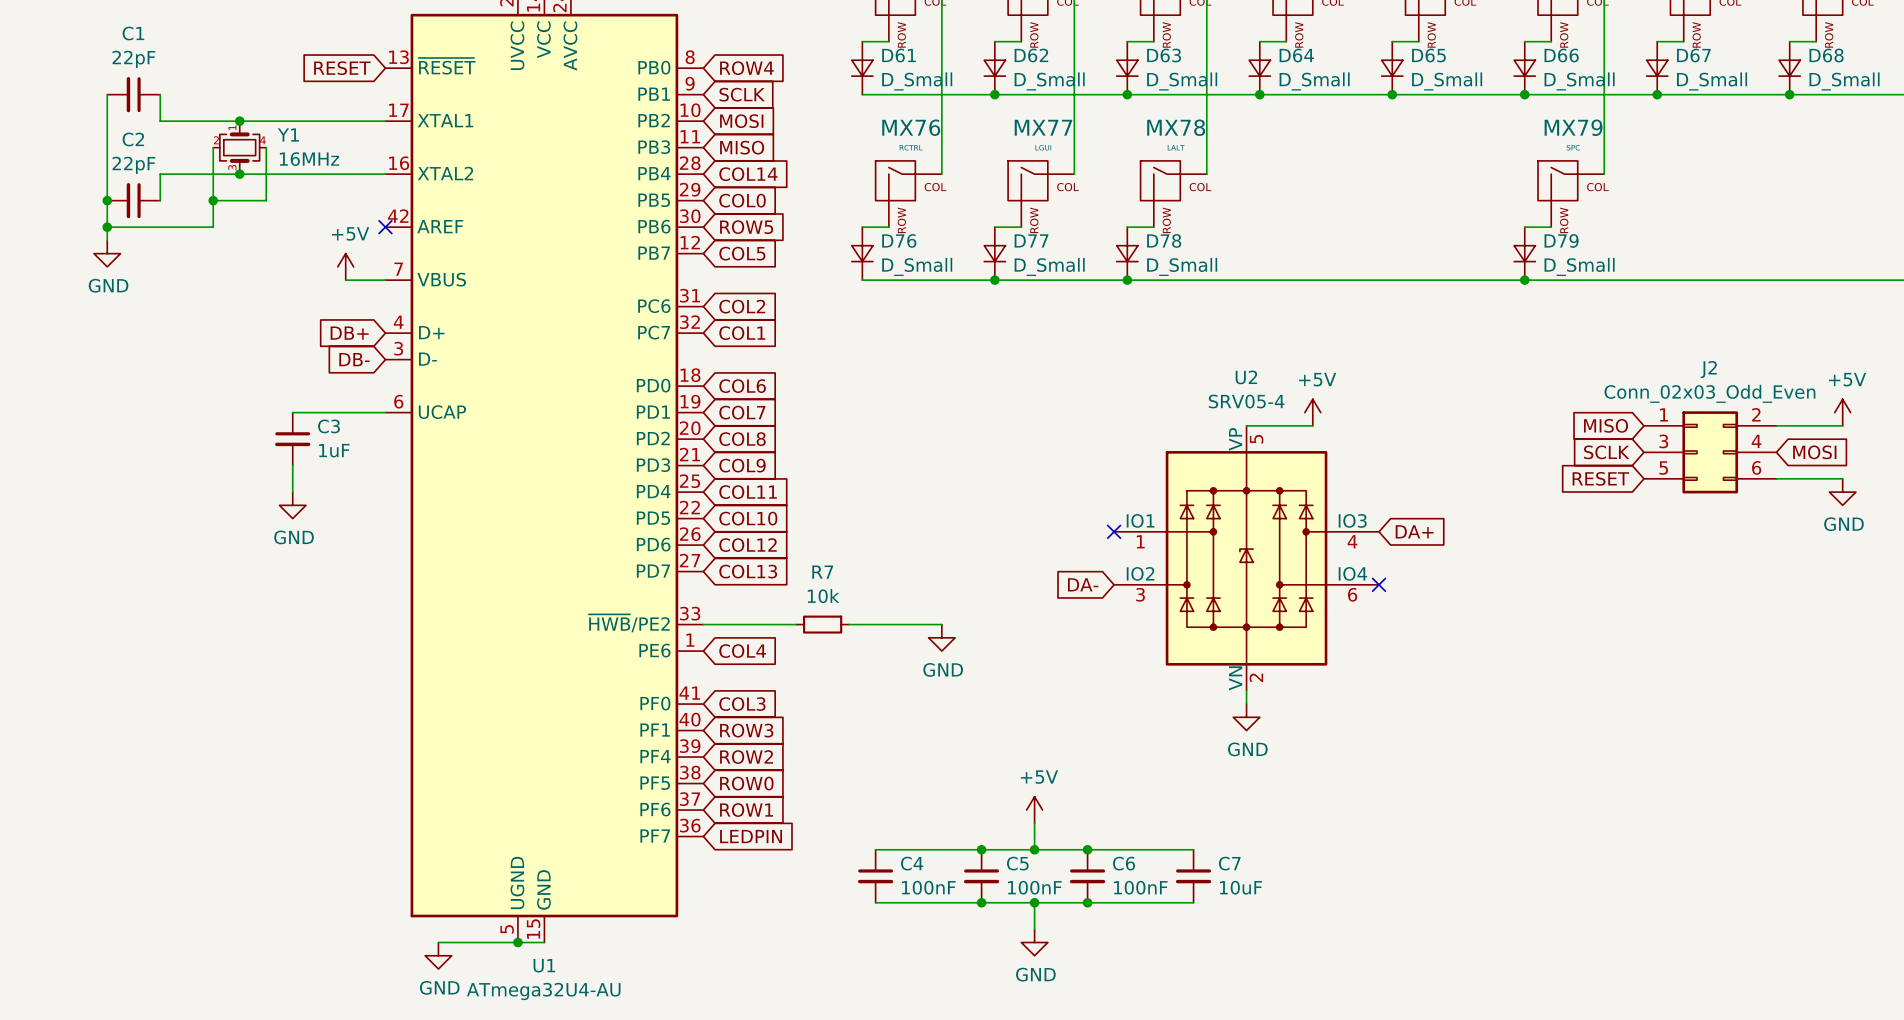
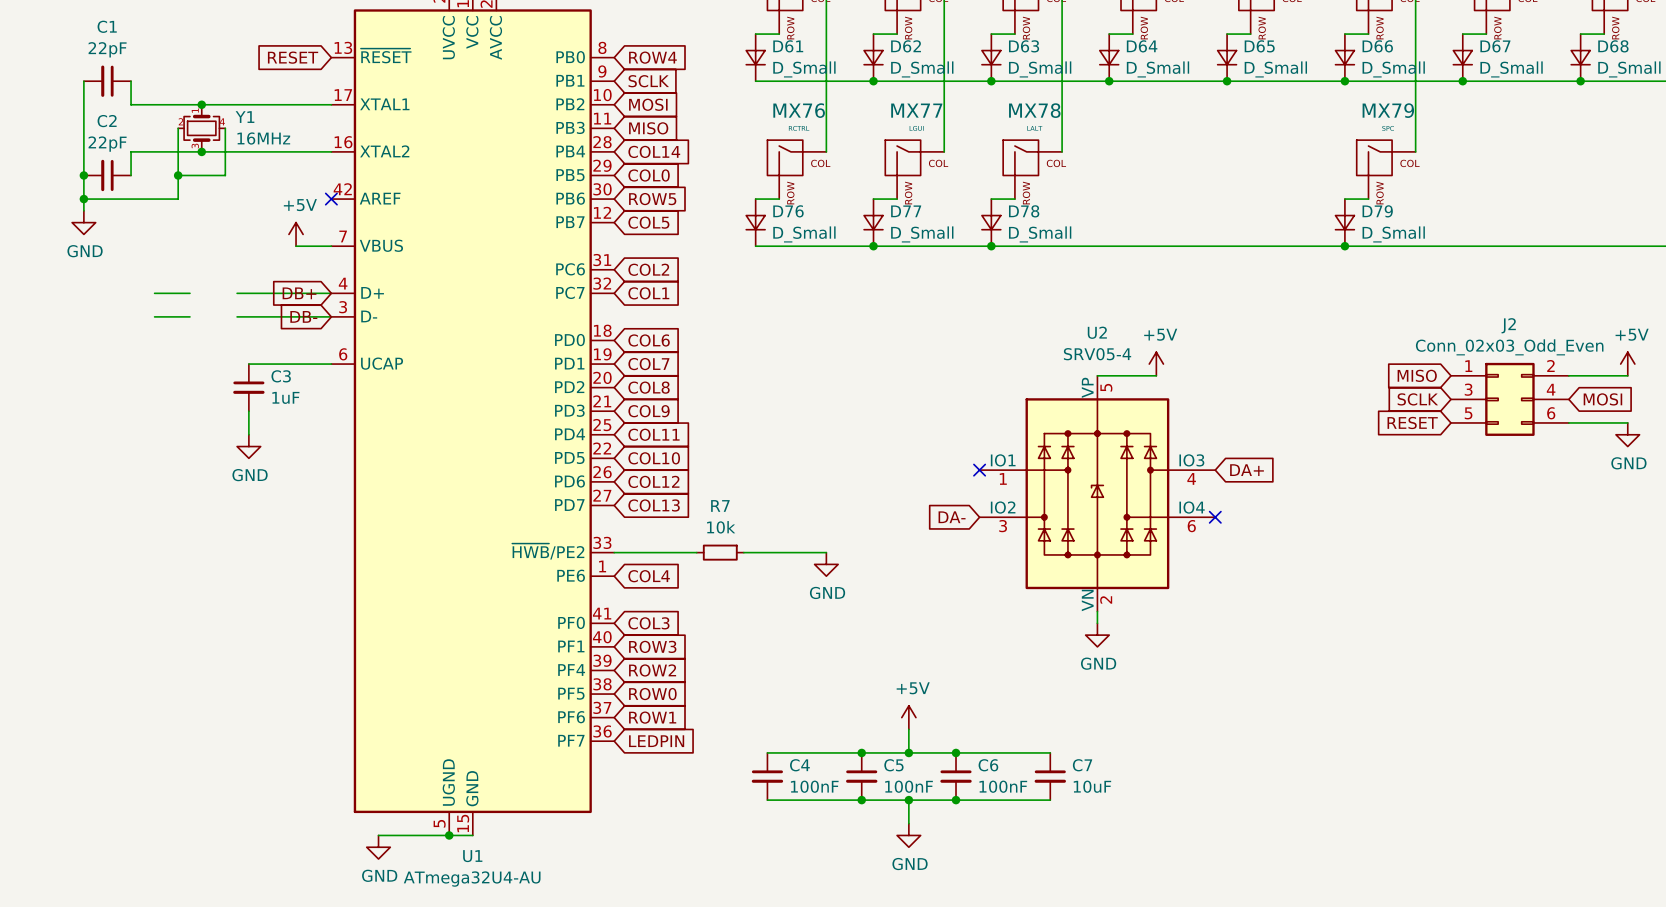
wire: none -> (154, 293) (189, 293)
wire: none -> (237, 293) (331, 293)
wire: none -> (154, 316) (189, 316)
wire: none -> (237, 316) (331, 316)

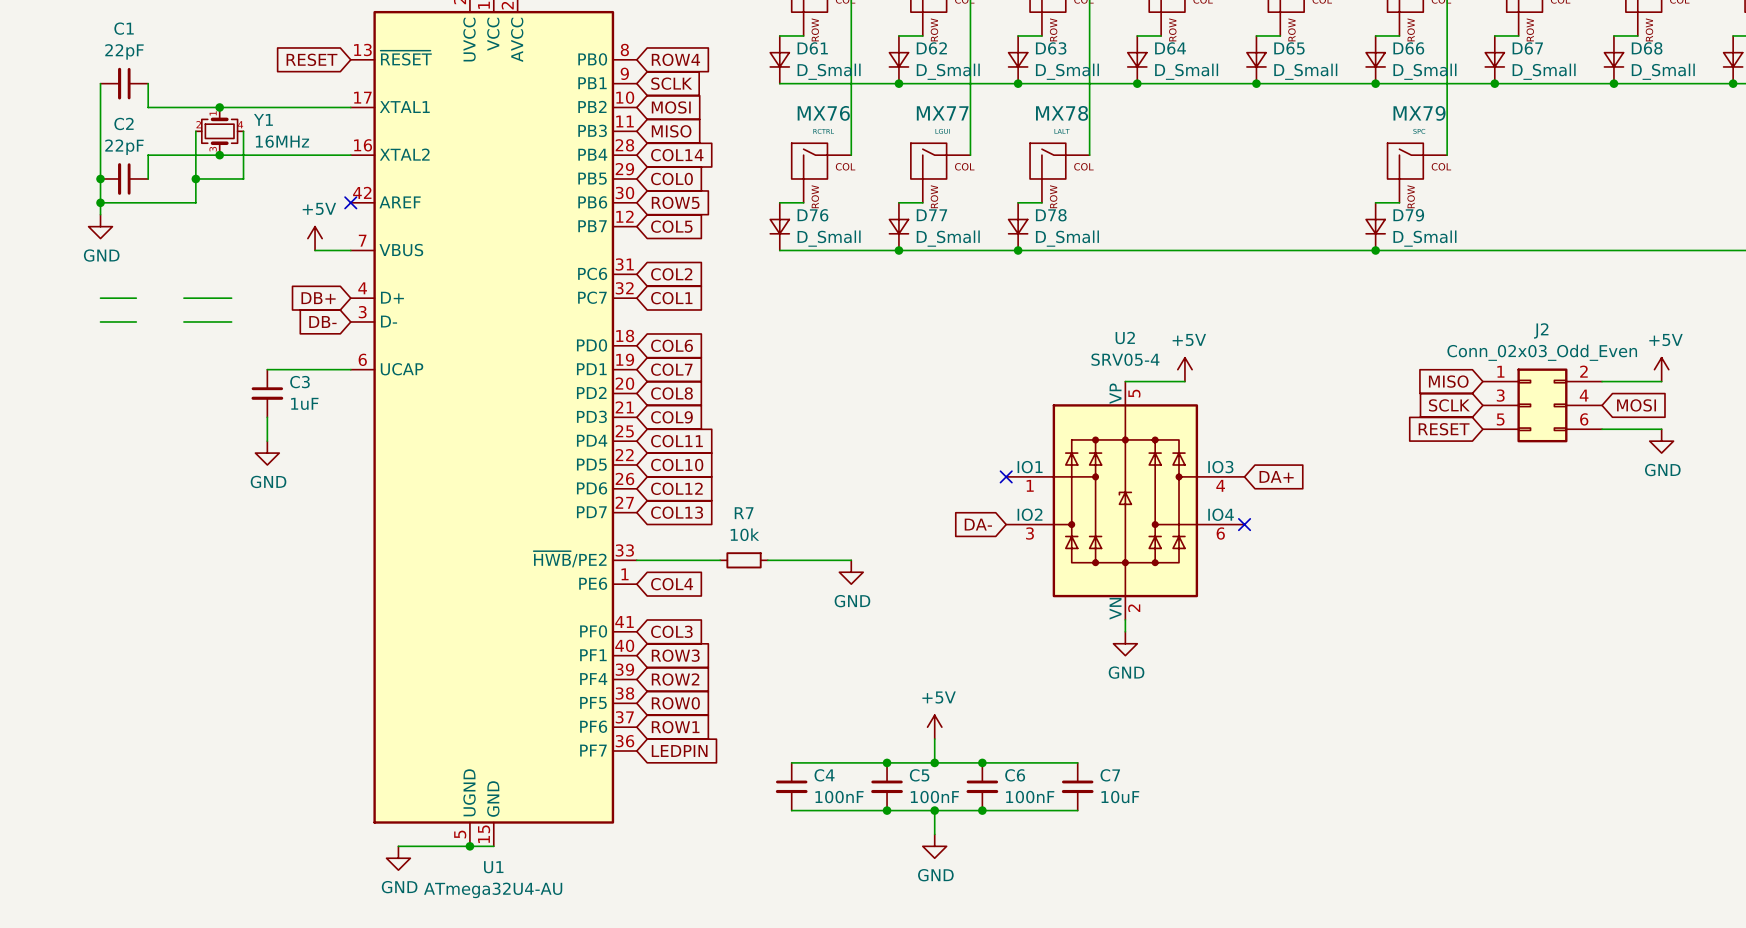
wire: none -> (100, 298) (136, 298)
wire: (154, 293) (166, 293) -> none
wire: none -> (207, 298) (231, 298)
wire: (237, 293) (331, 293) -> none
wire: none -> (100, 321) (136, 321)
wire: (154, 316) (166, 316) -> none
wire: none -> (207, 321) (231, 321)
wire: (237, 316) (331, 316) -> none

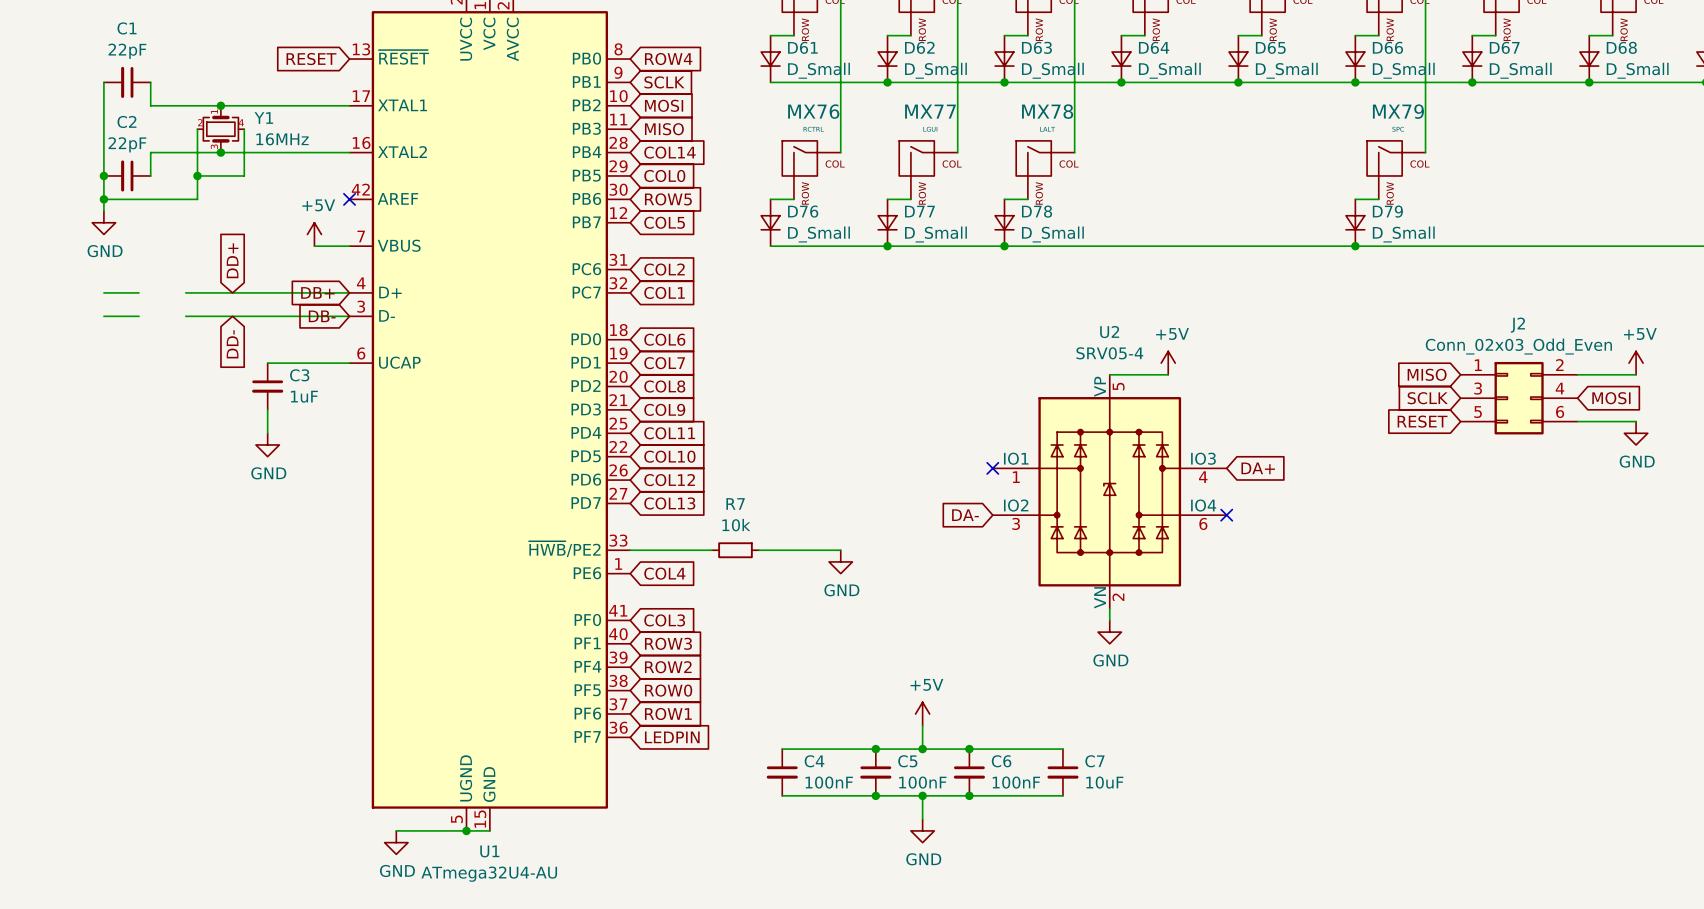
global label: none -> DD+ (232, 260)
wire: none -> (232, 292) (349, 292)
wire: none -> (232, 316) (349, 316)
global label: none -> DD- (232, 344)

